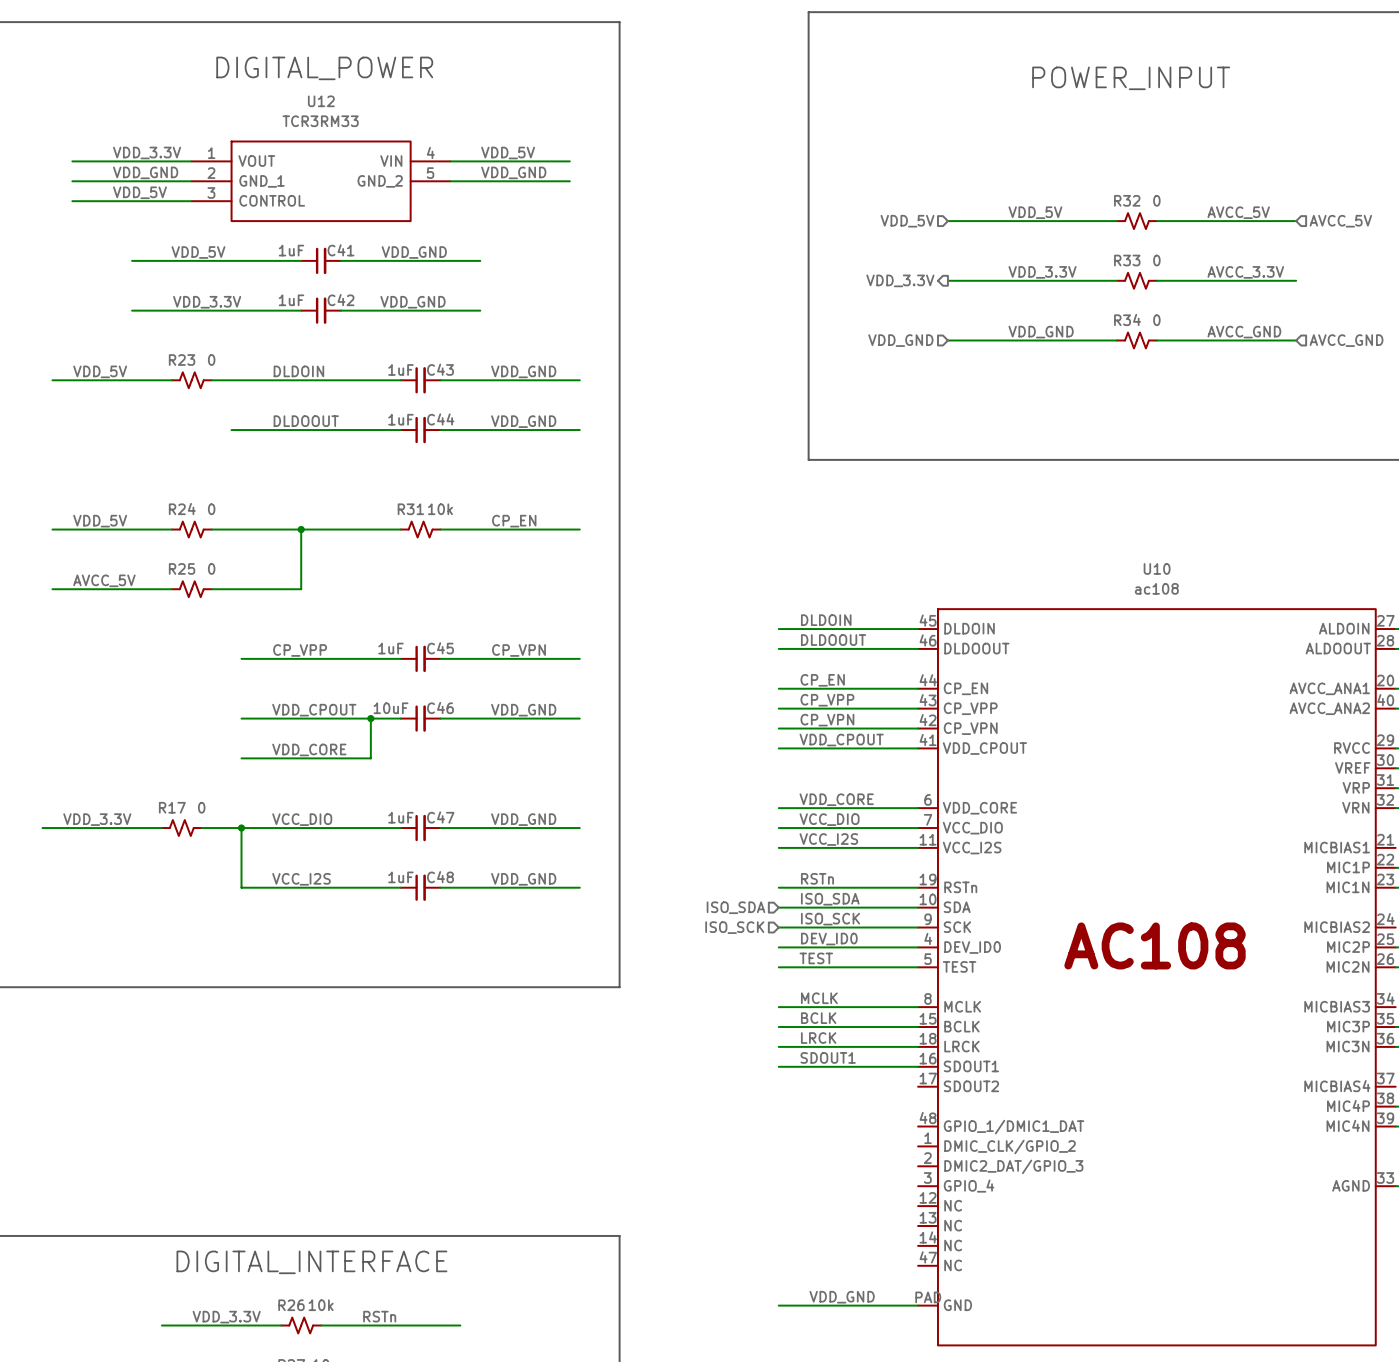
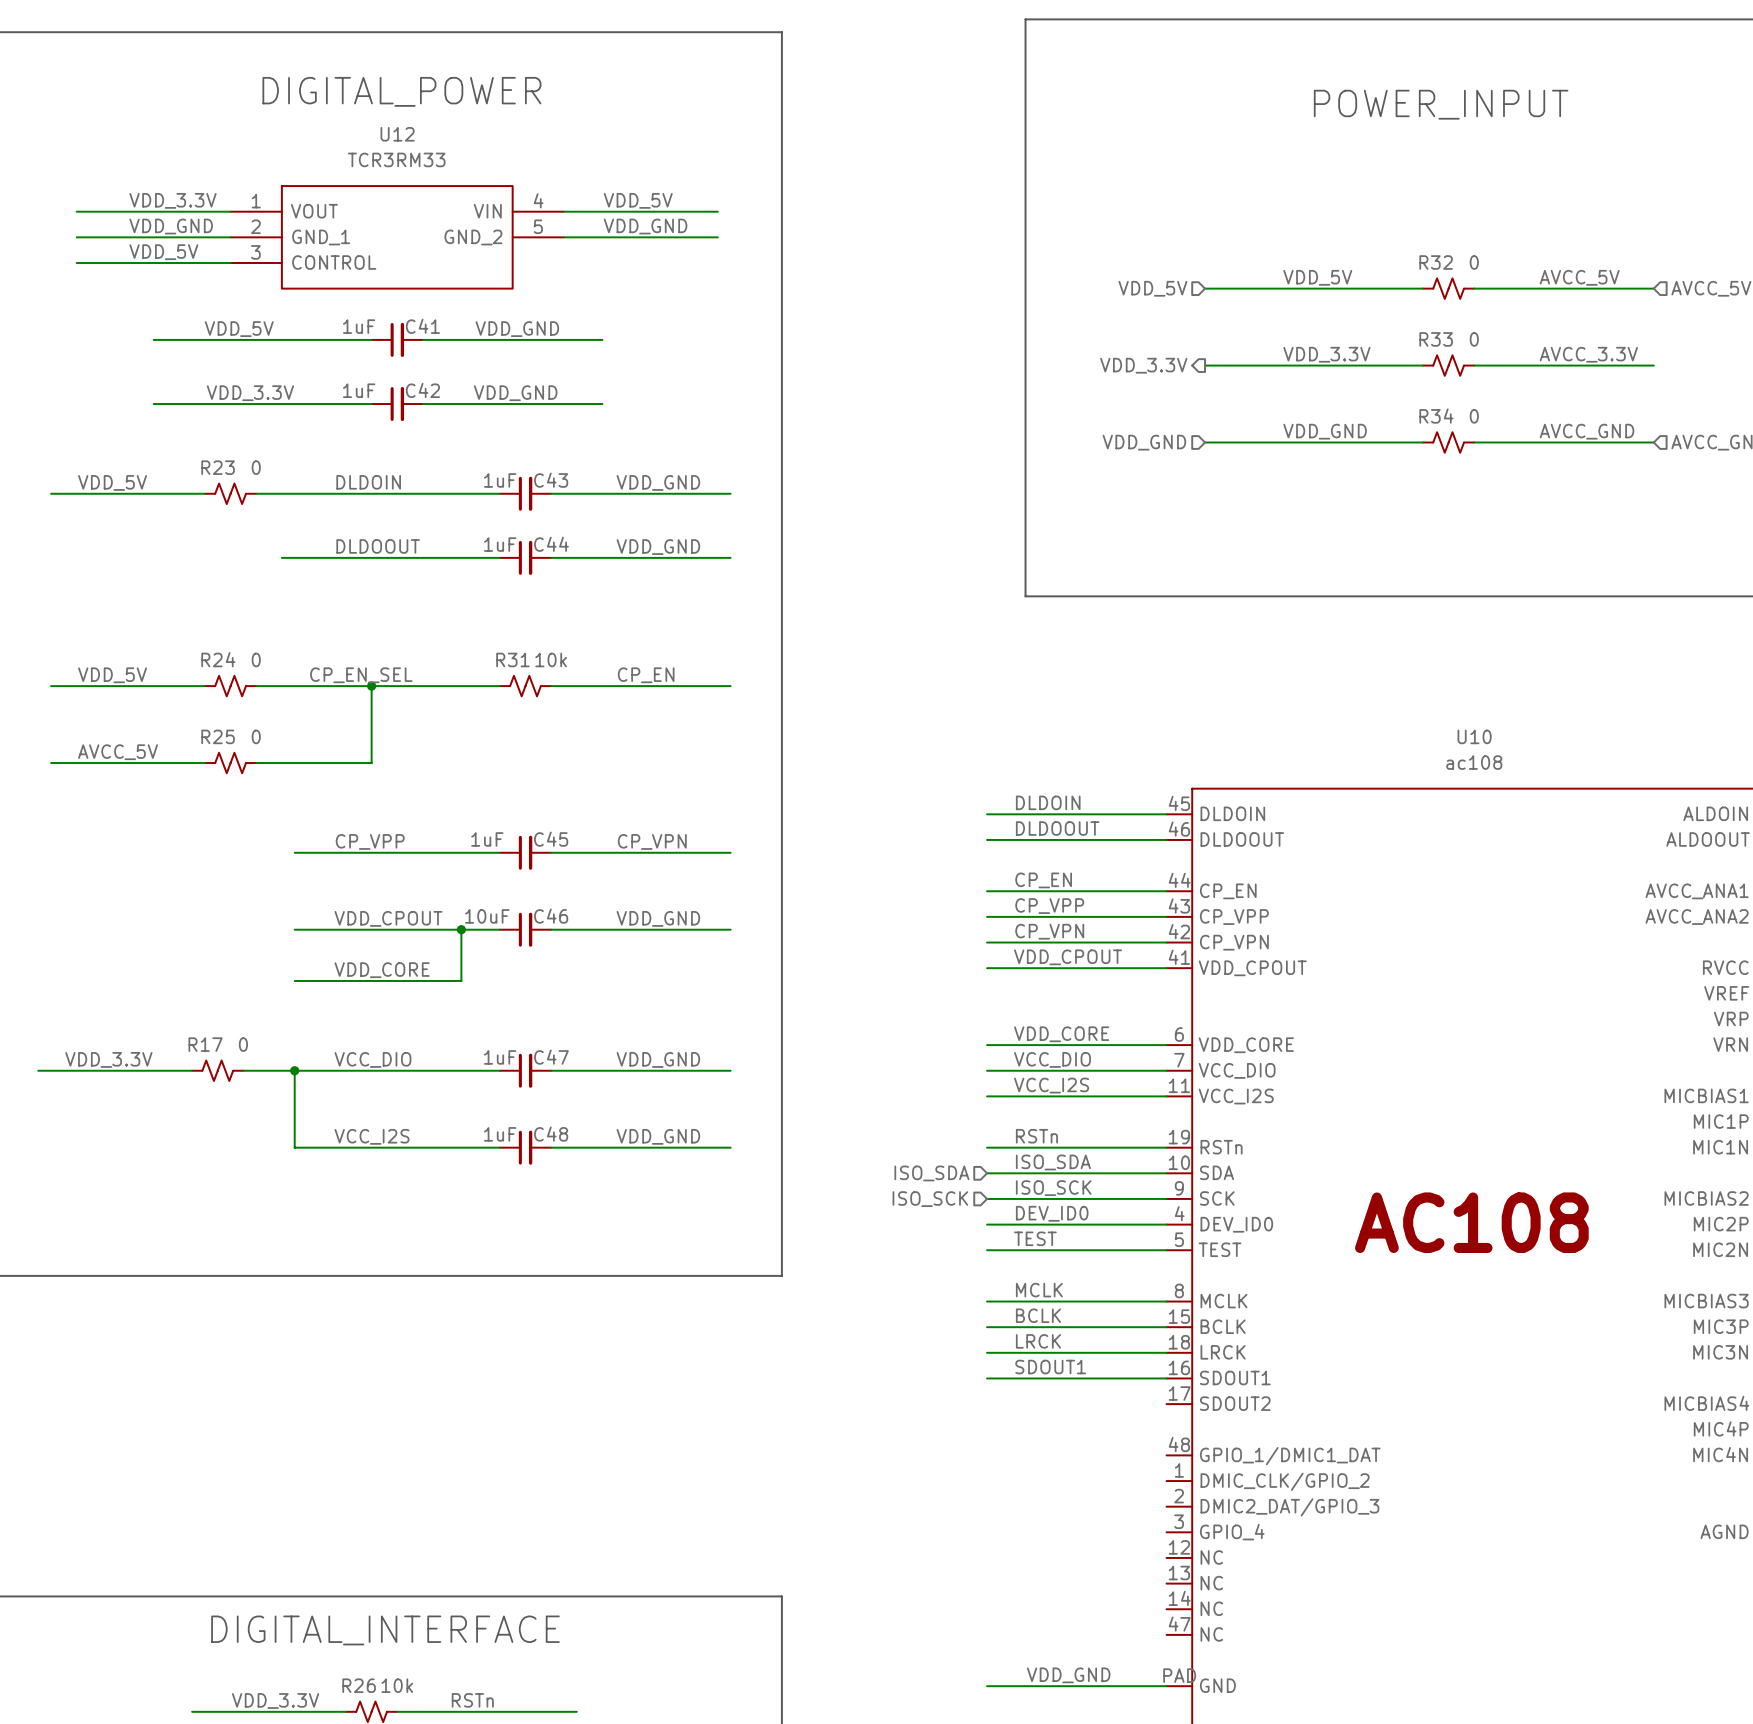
label: none -> CP_EN_SEL (361, 675)

